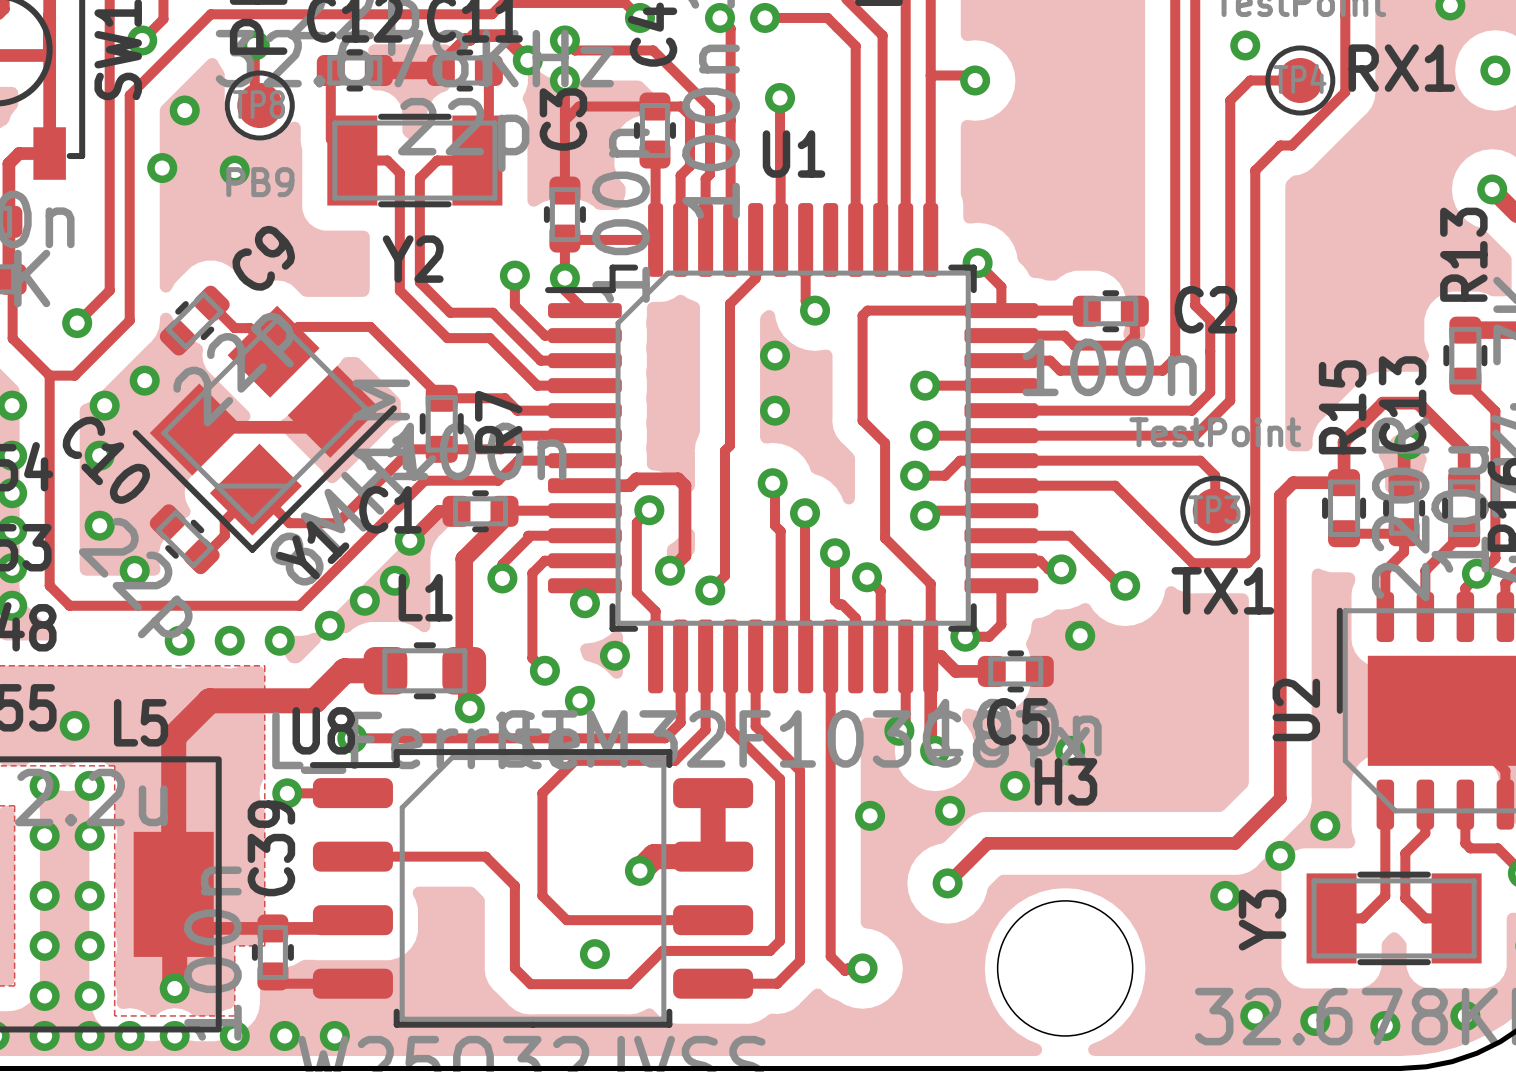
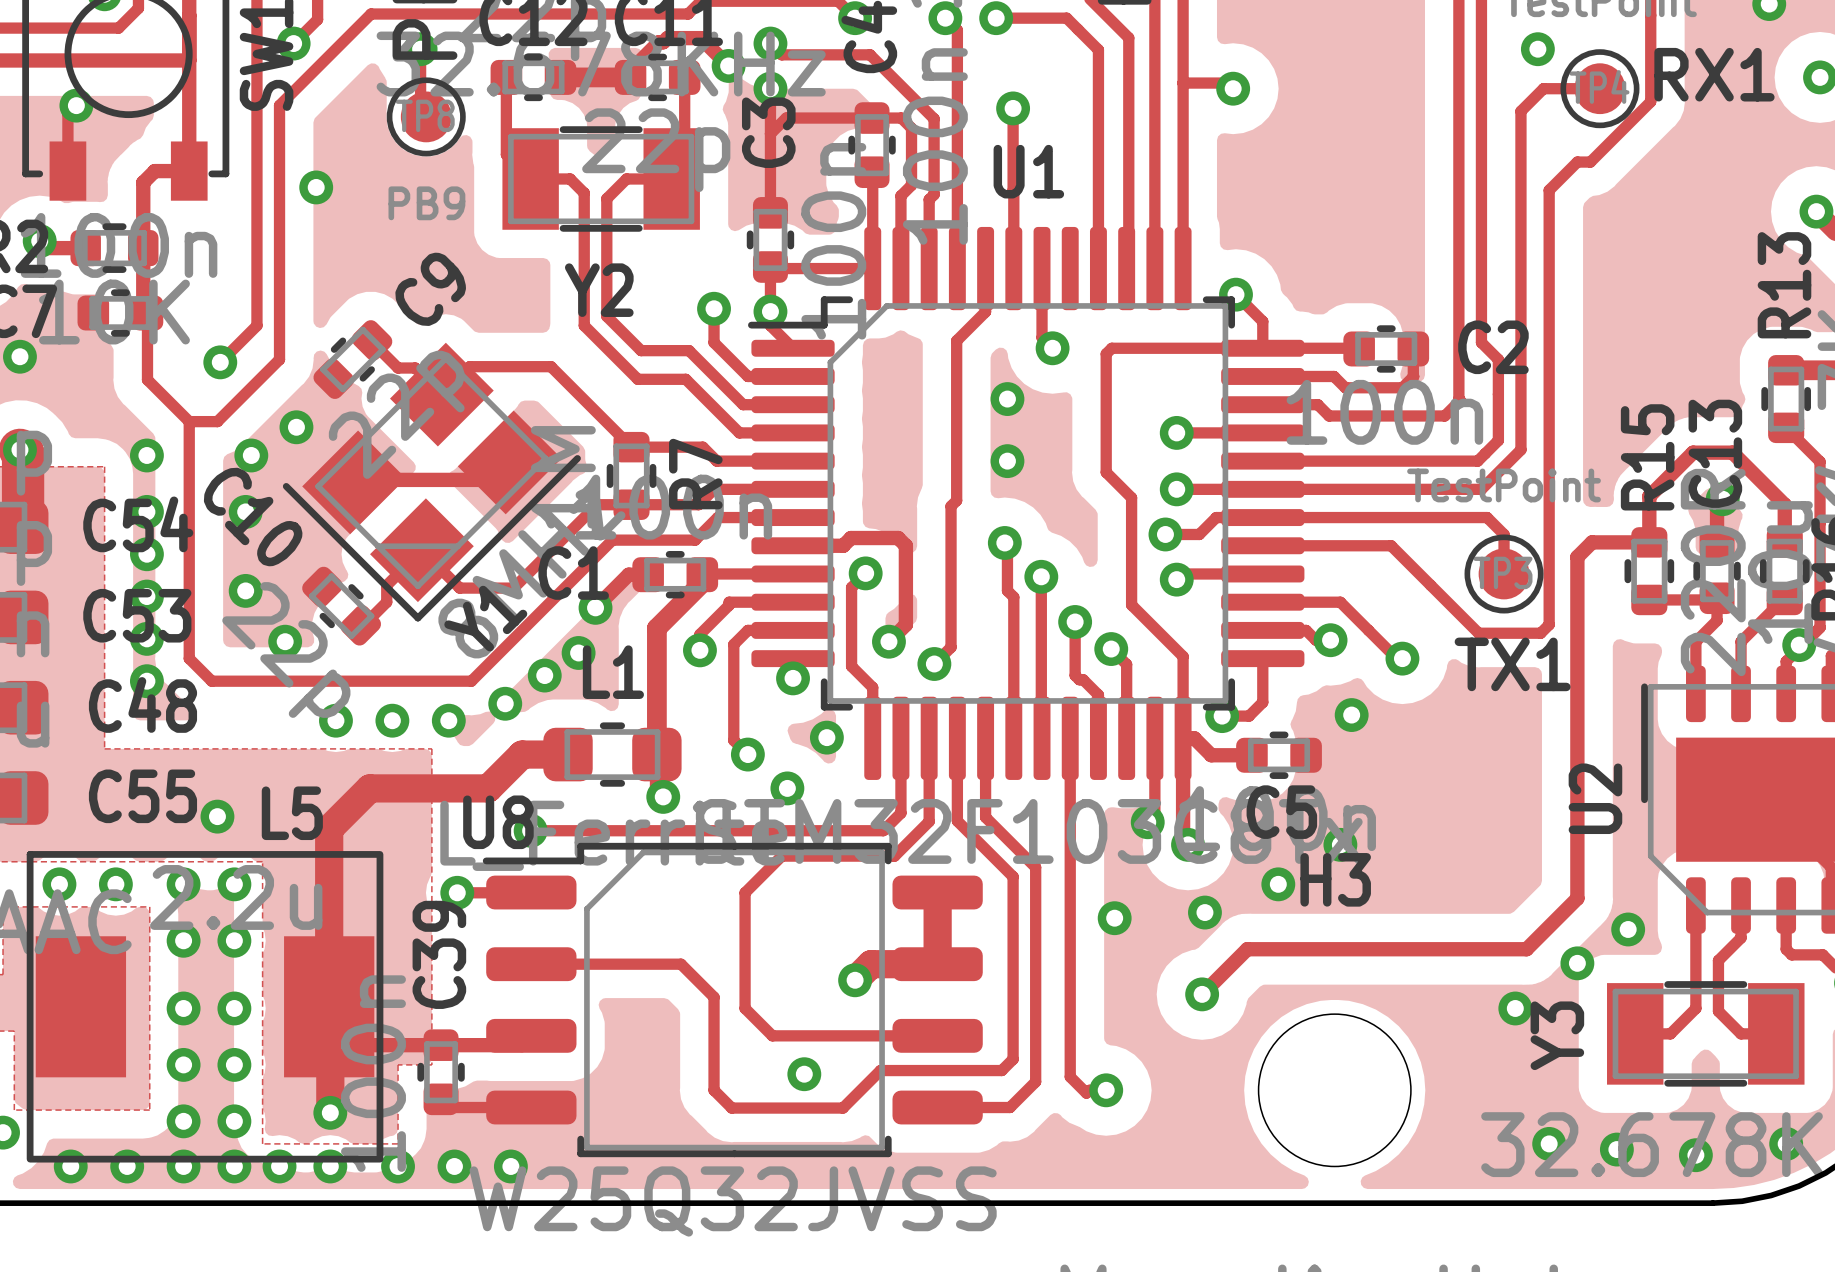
via: (184, 110) -> none
via: (234, 170) -> none

